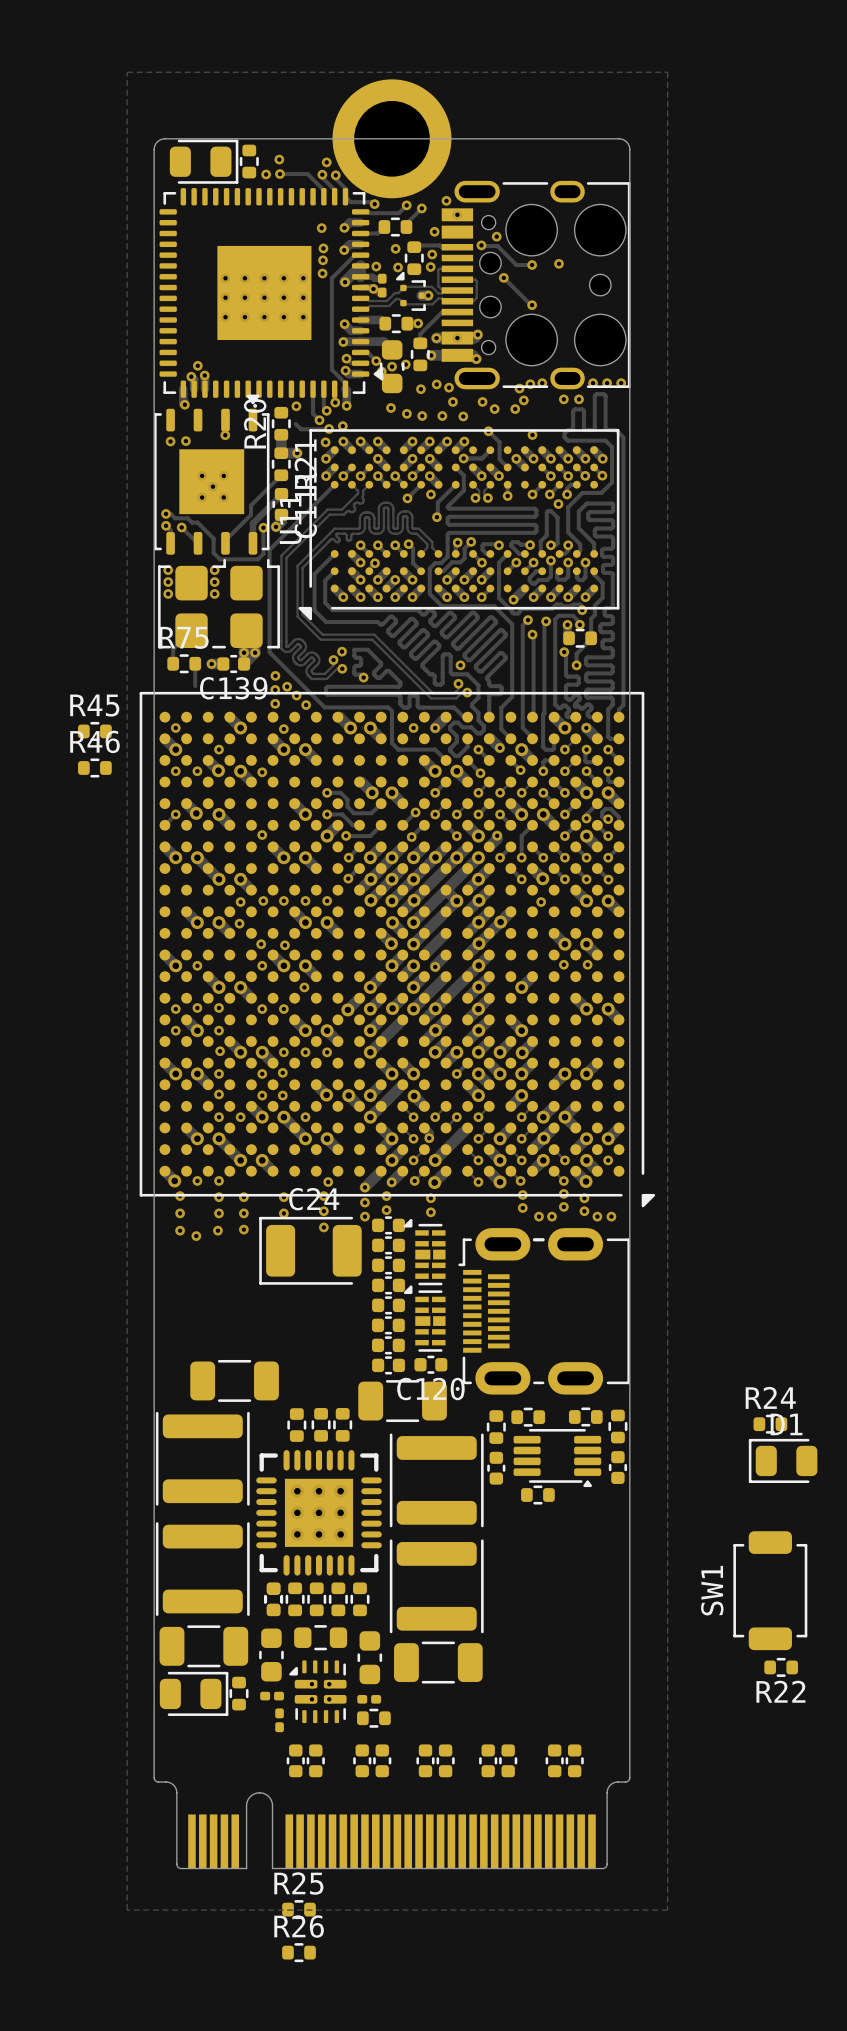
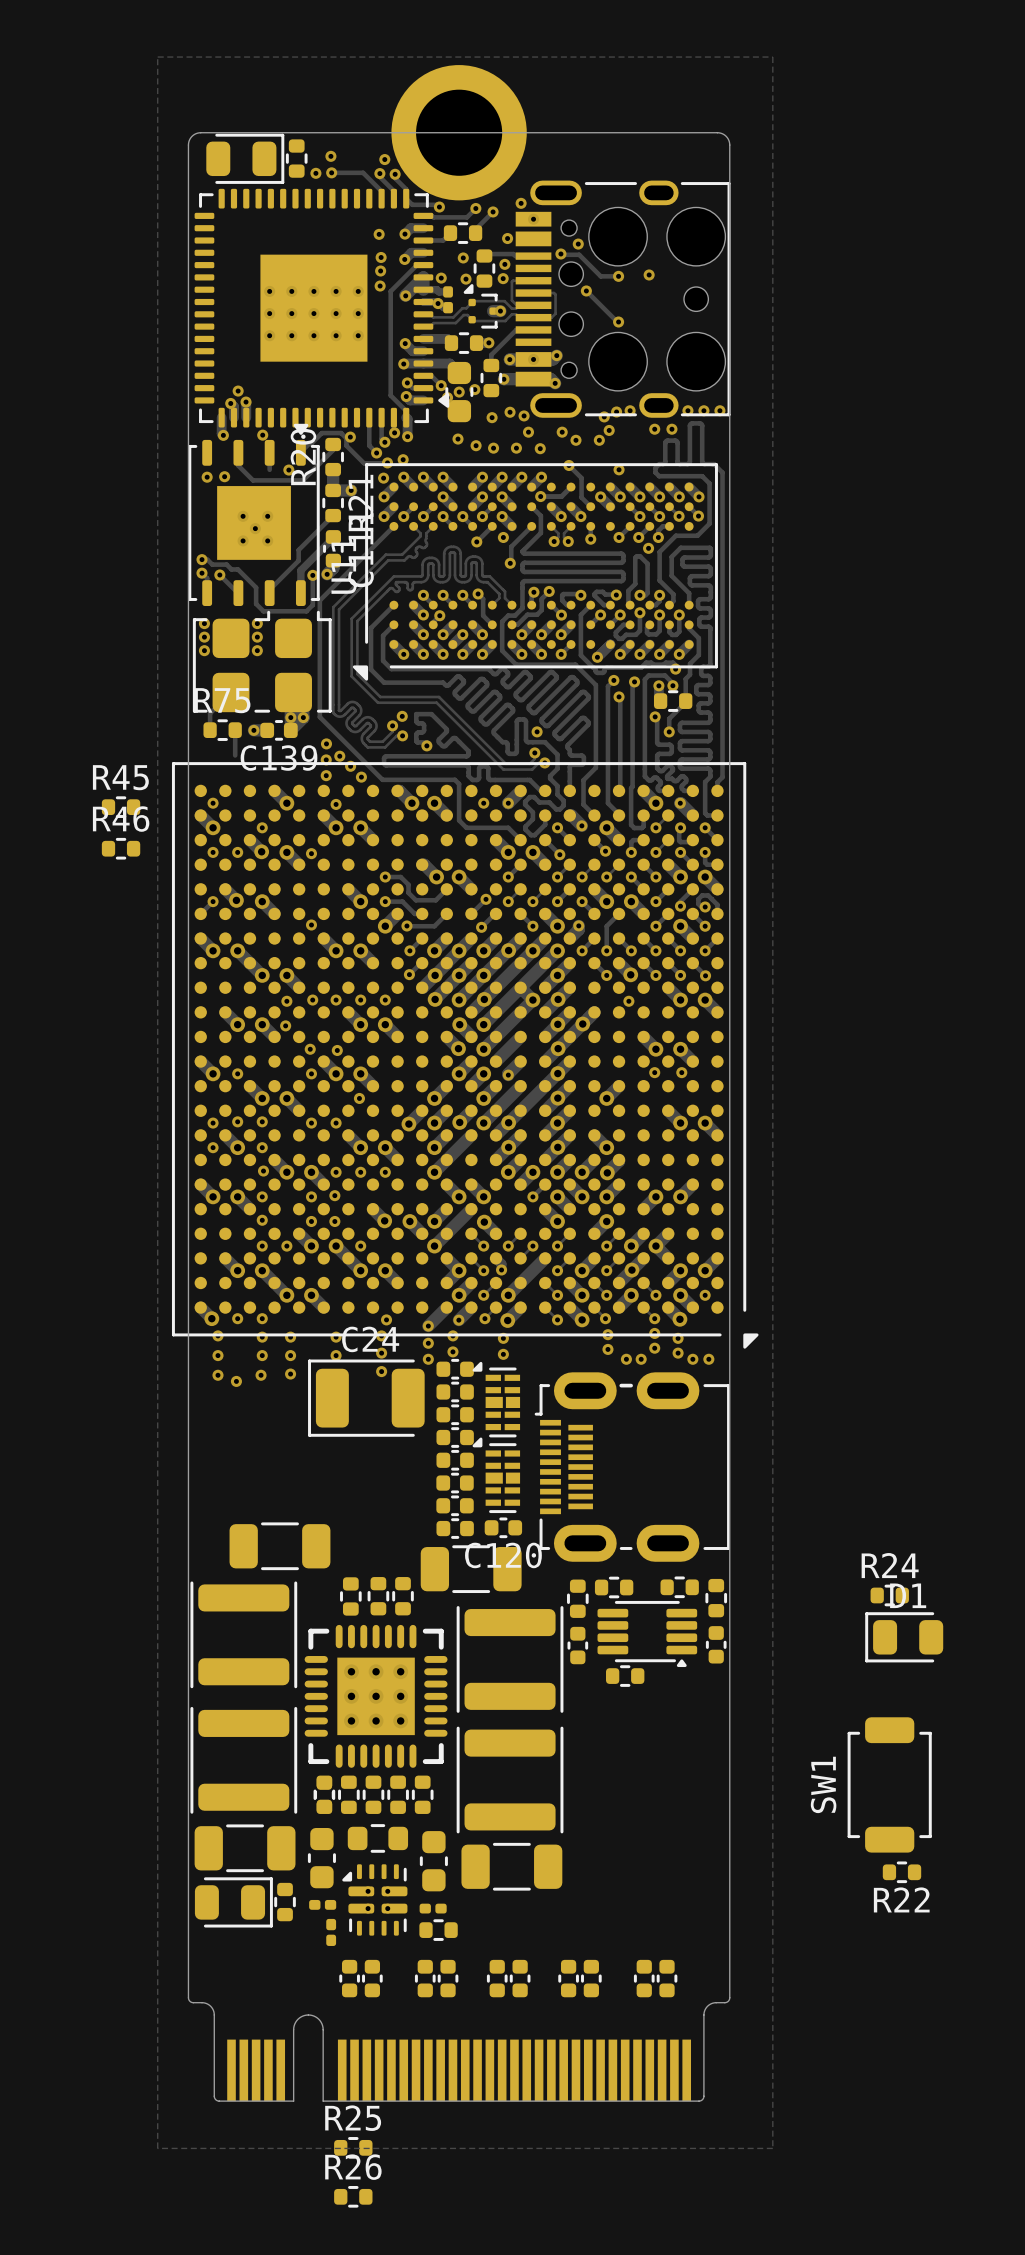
via: none -> (262, 435)
track: none -> (333, 444) (333, 450) (302, 480) (253, 480) (238, 465) (238, 452)
track: (295, 423) (301, 429) (328, 429) -> (300, 452) (321, 433) (341, 433) (346, 438) (346, 445) (364, 463) (387, 463)
via: (225, 435) -> none
via: none -> (288, 470)

